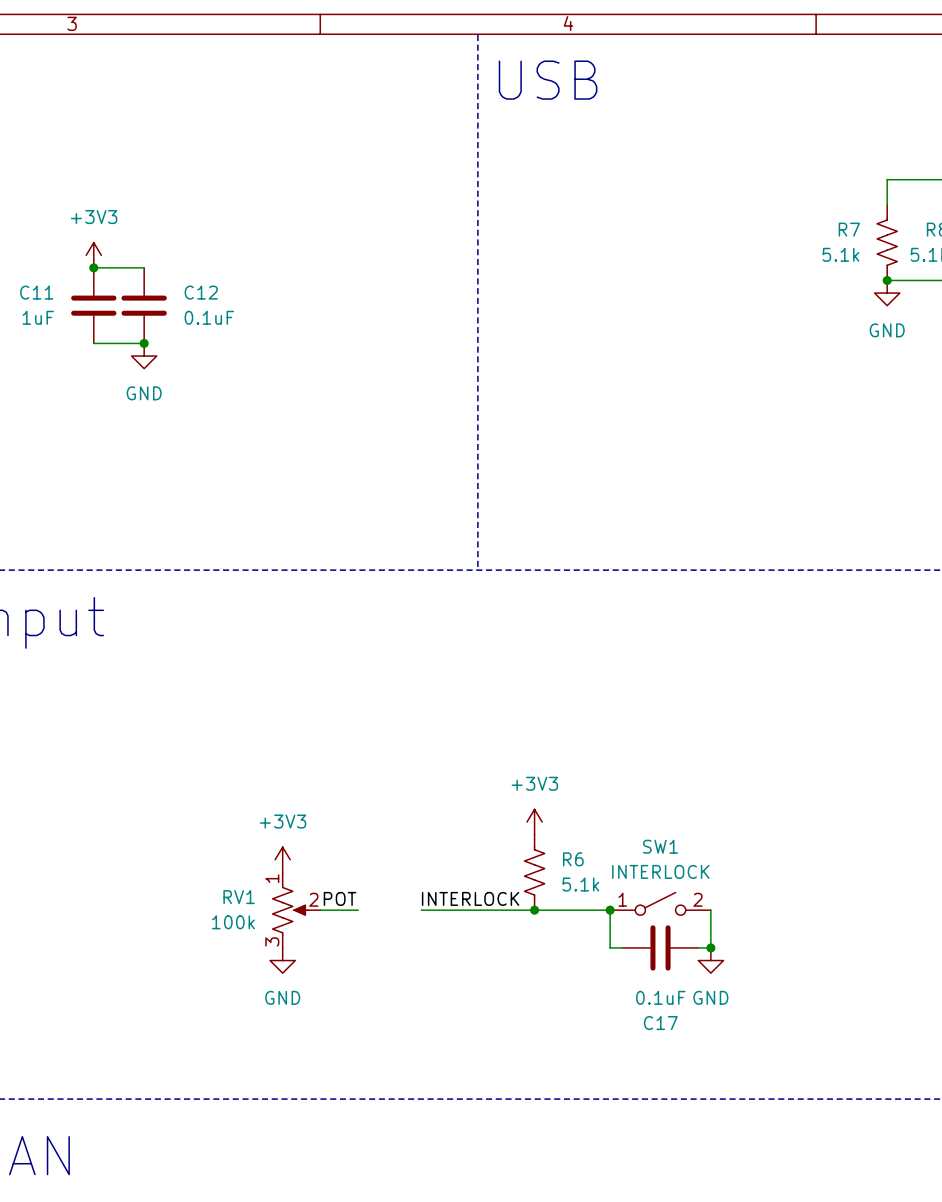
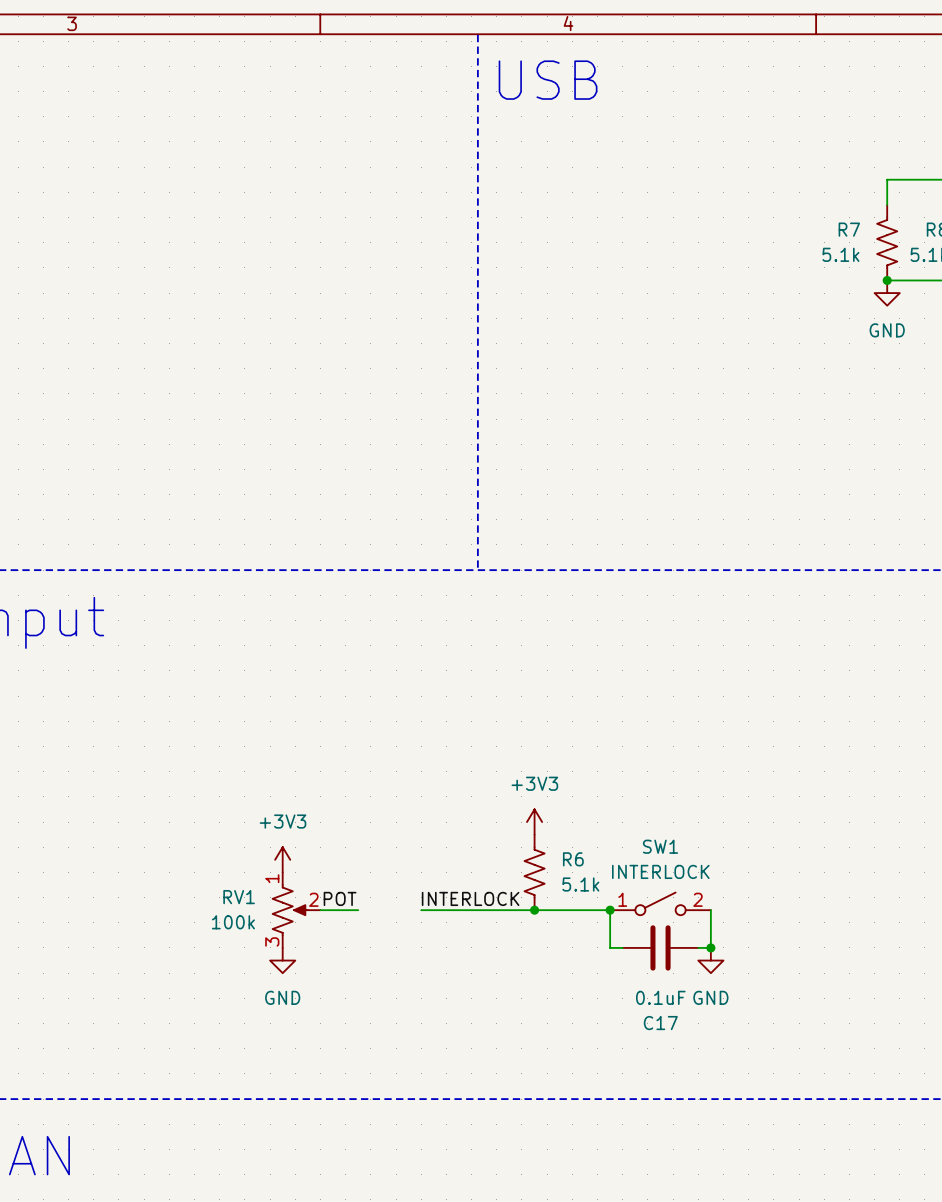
power symbol: +3V3 (93, 255) -> none
wire: (93, 267) (144, 267) -> none
junction: (93, 267) -> none
C11: 1uF (93, 305) -> none
C12: 0.1uF (144, 305) -> none
wire: (93, 343) (144, 343) -> none
junction: (144, 343) -> none
power symbol: GND (144, 356) -> none

